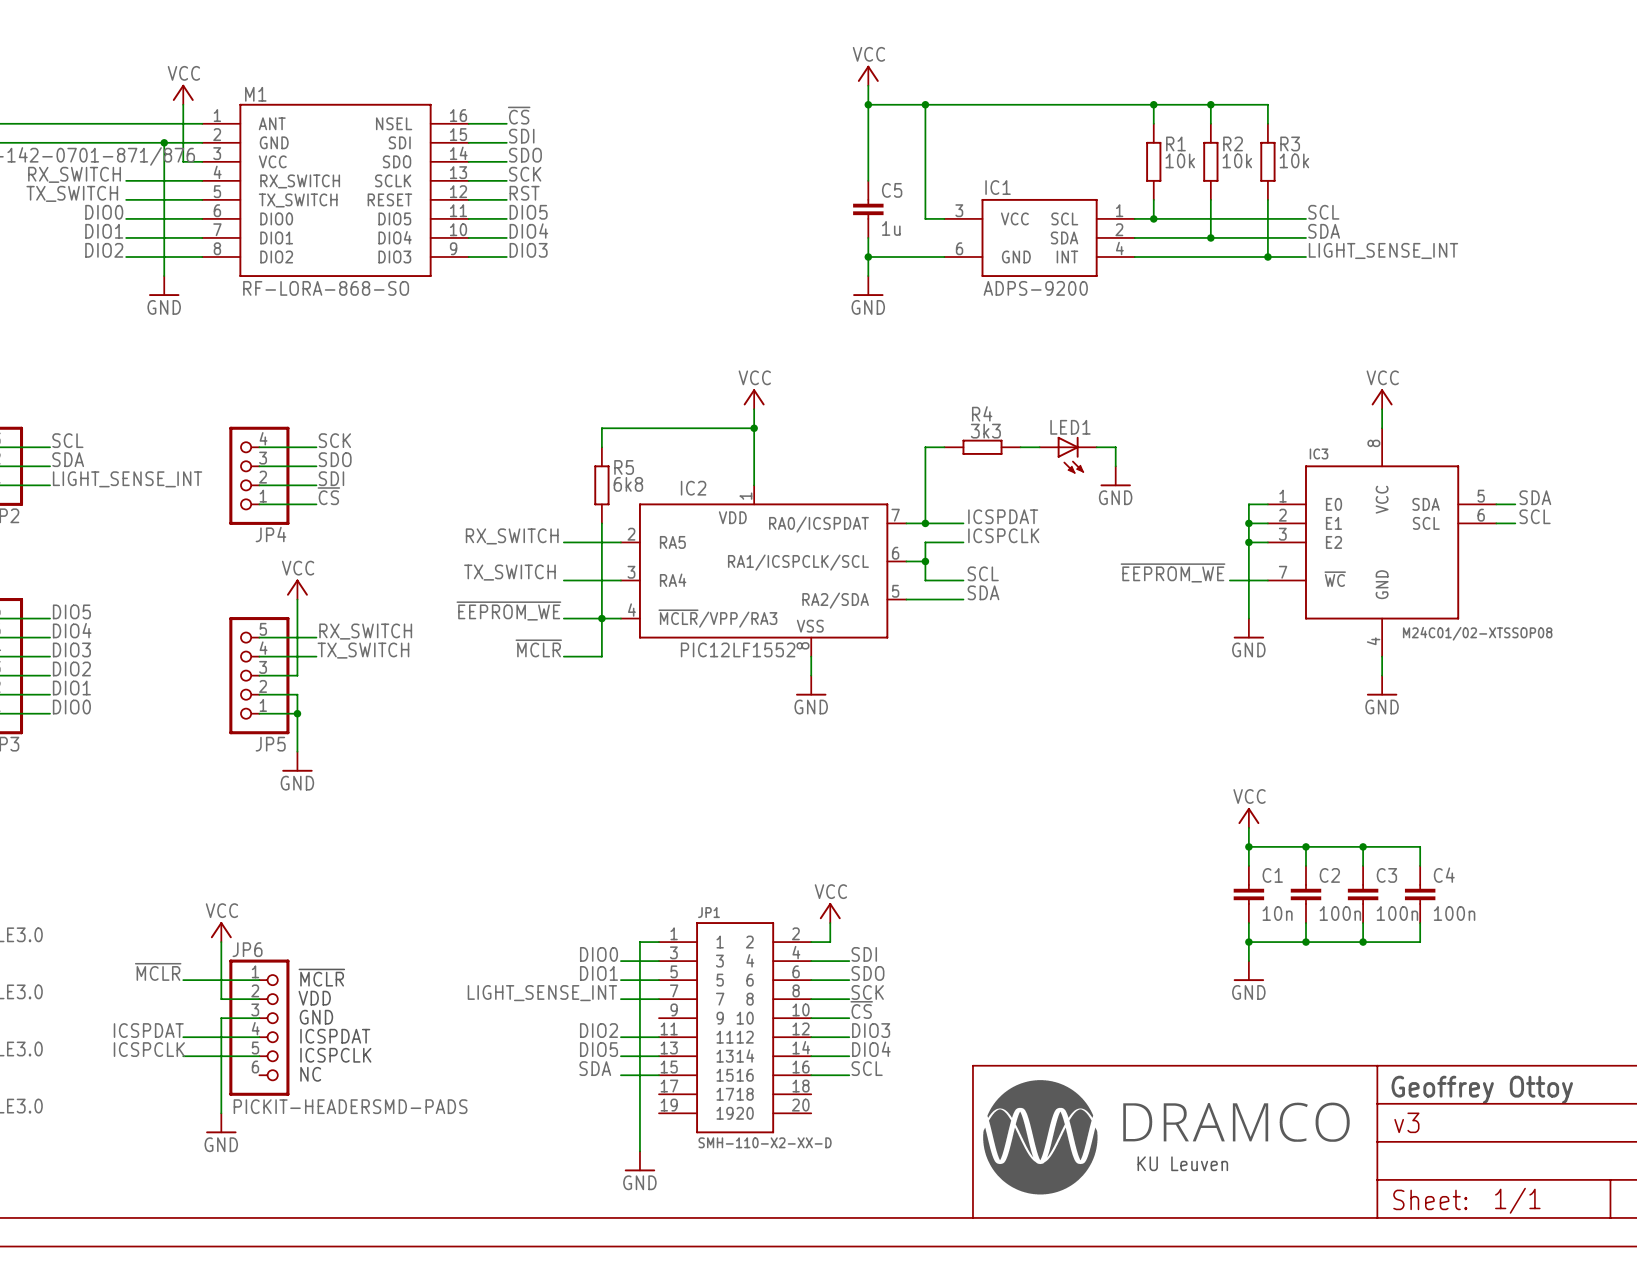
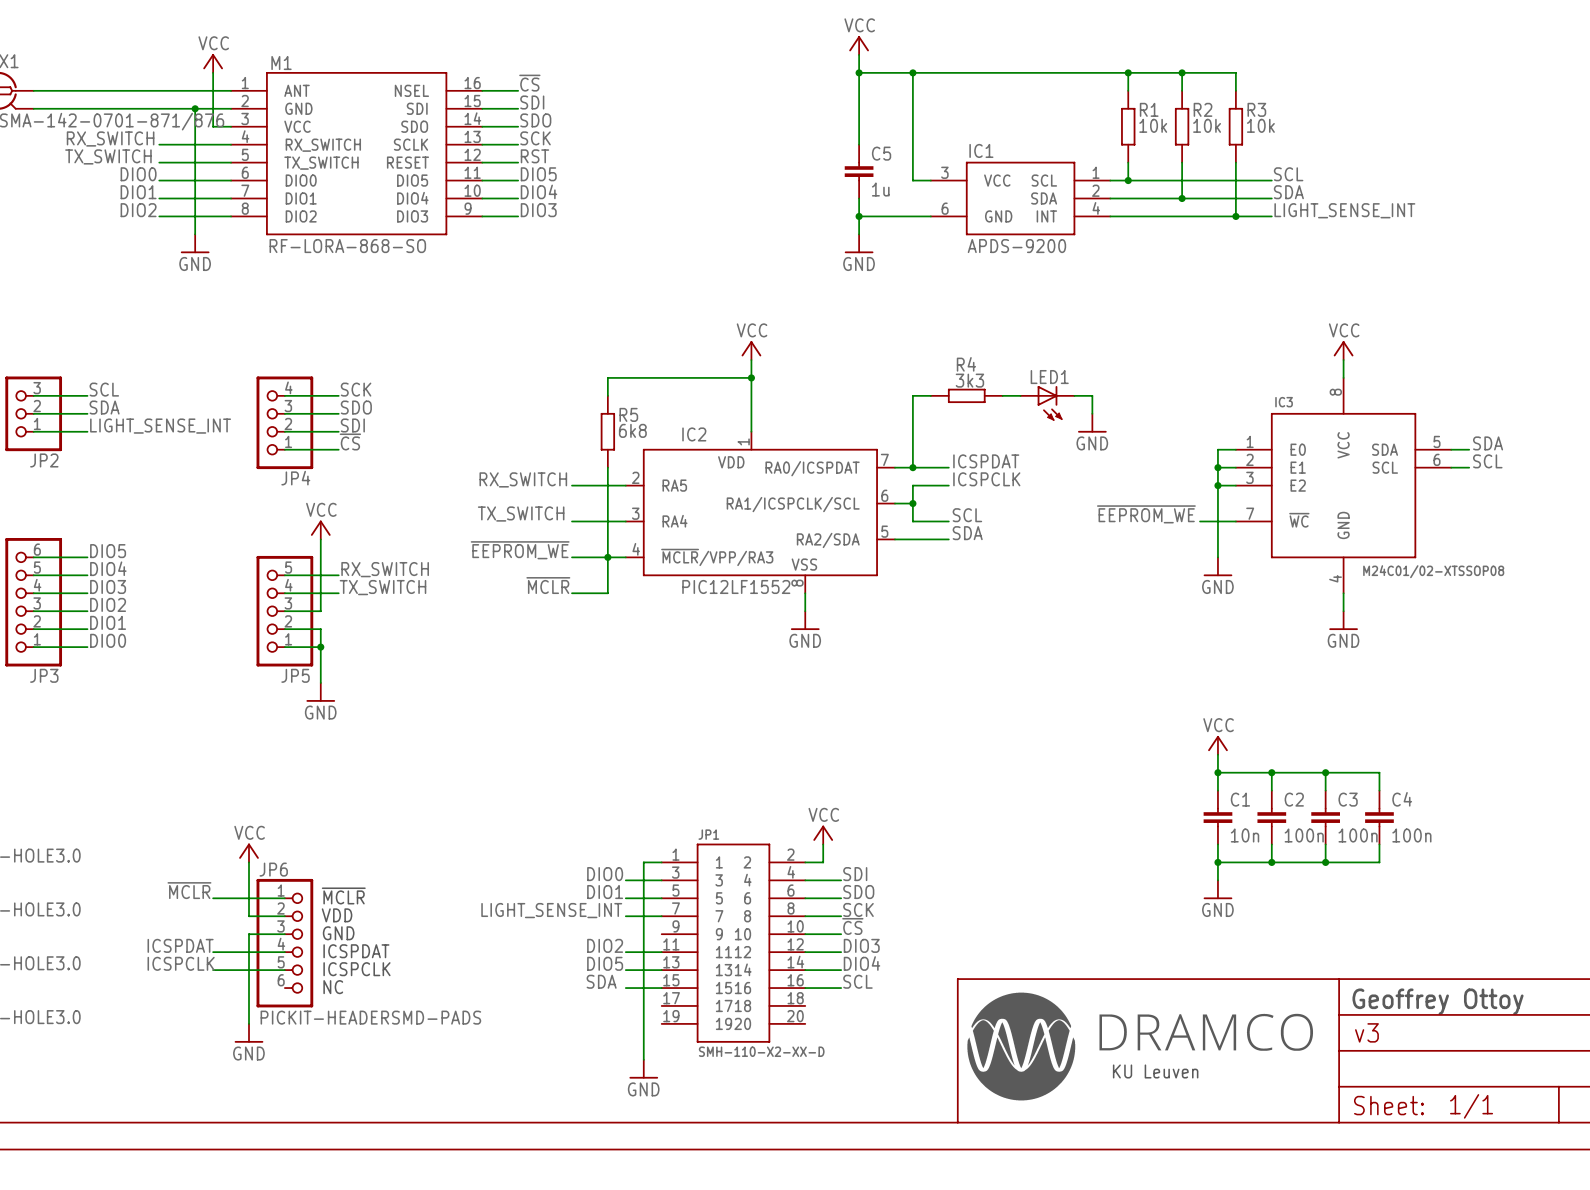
IC1 value: ADPS-9200 (1035, 288) -> APDS-9200 (1016, 246)

